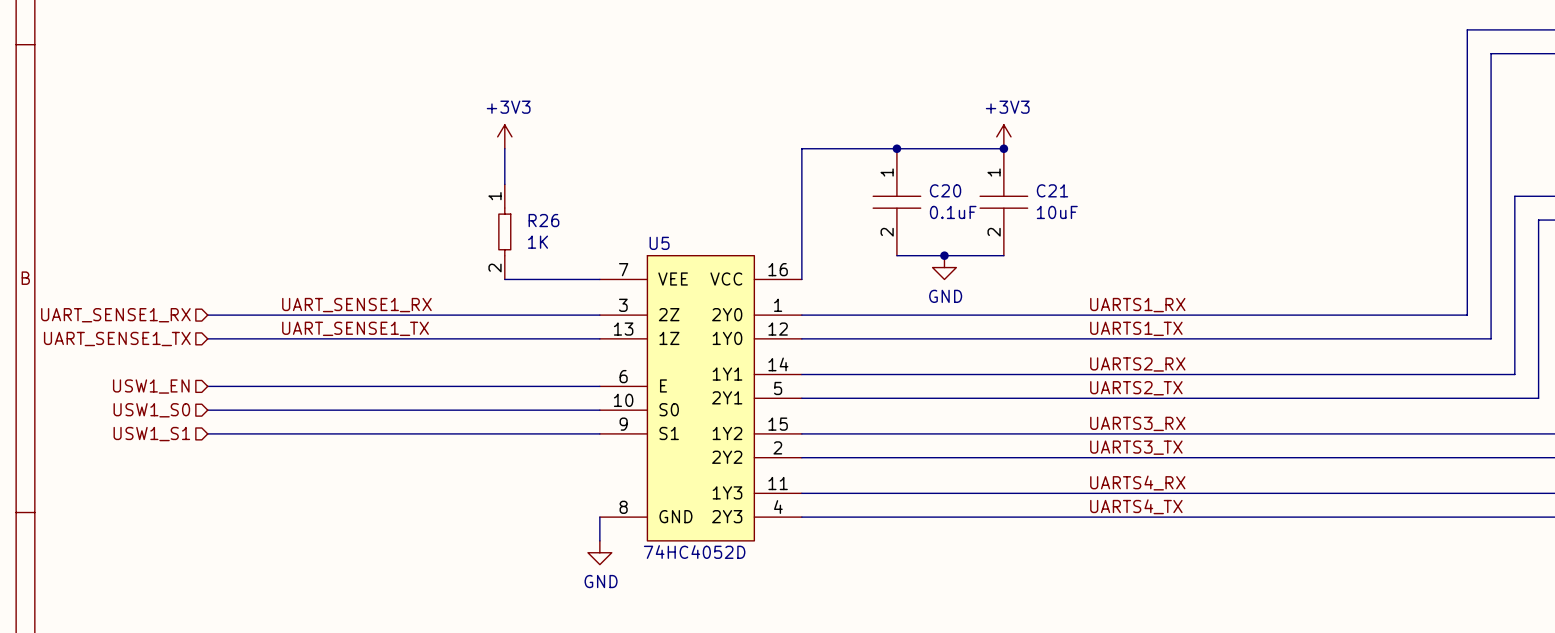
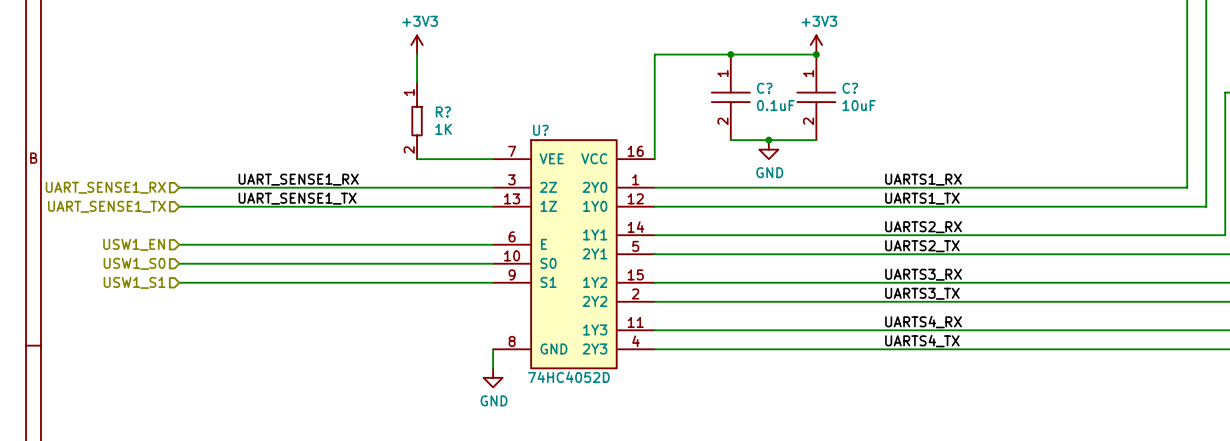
C20 name: C20 (945, 190) -> C? (764, 88)
C21 name: C21 (1052, 190) -> C? (850, 88)
R26 name: R26 (543, 220) -> R? (443, 112)
U5 name: U5 (659, 243) -> U? (540, 130)

